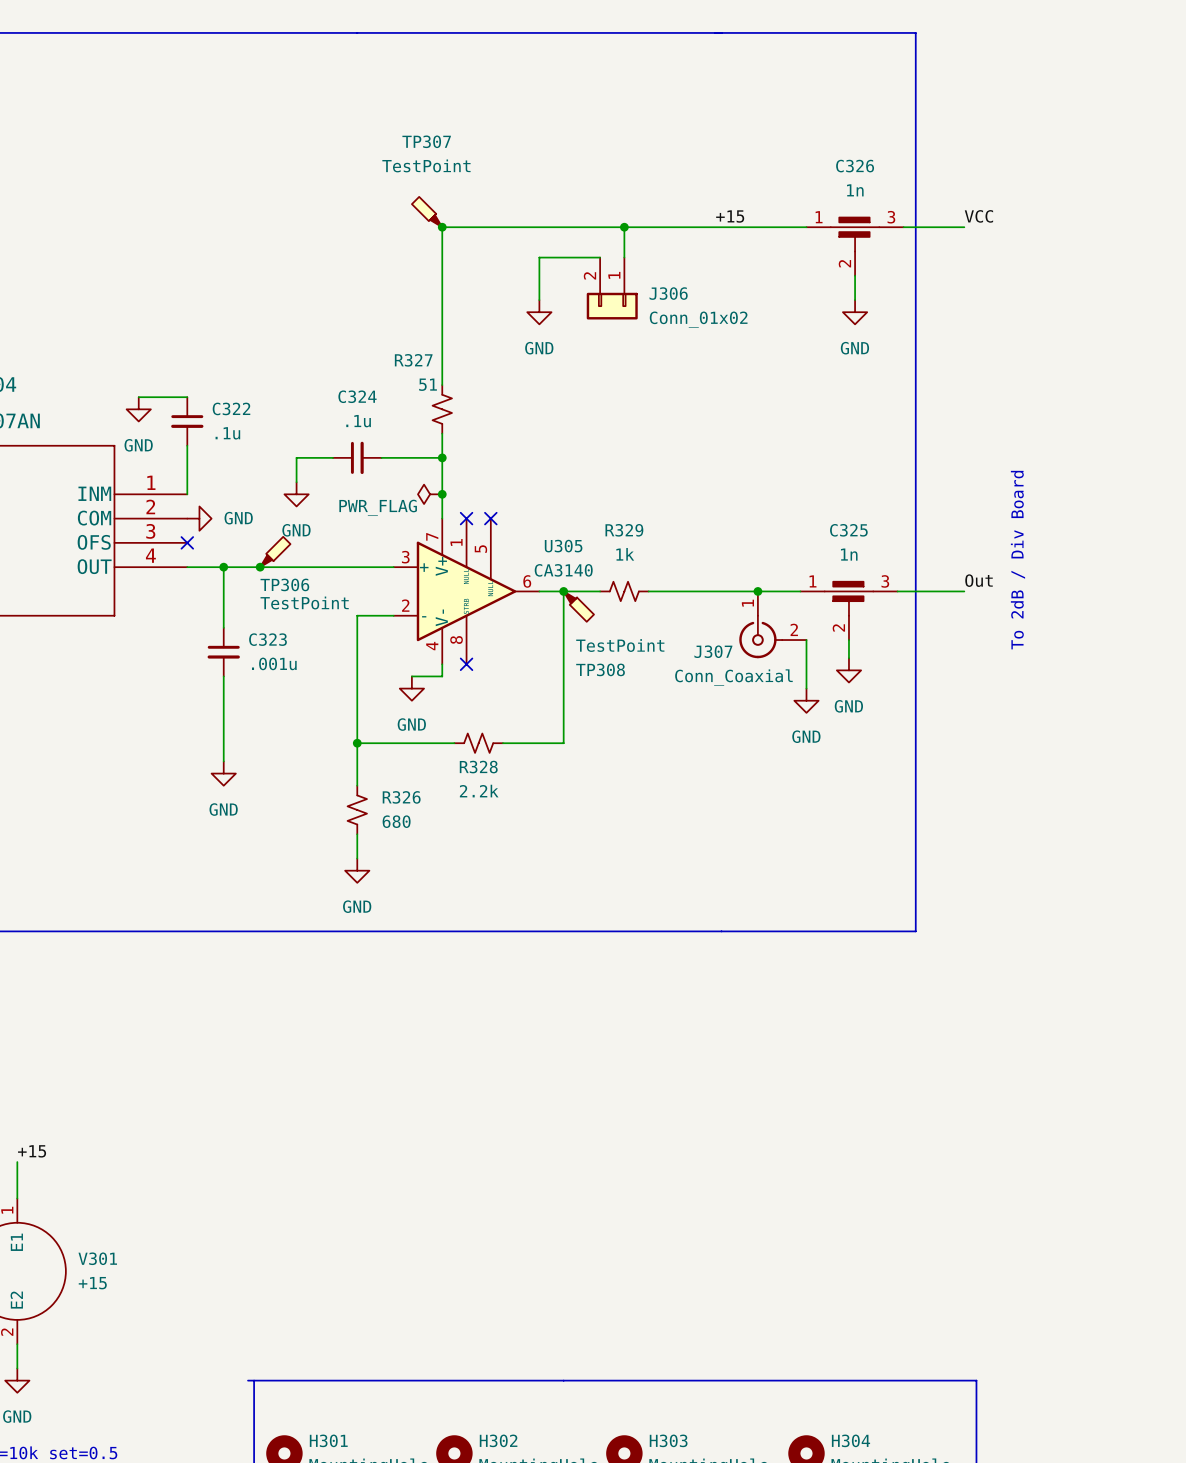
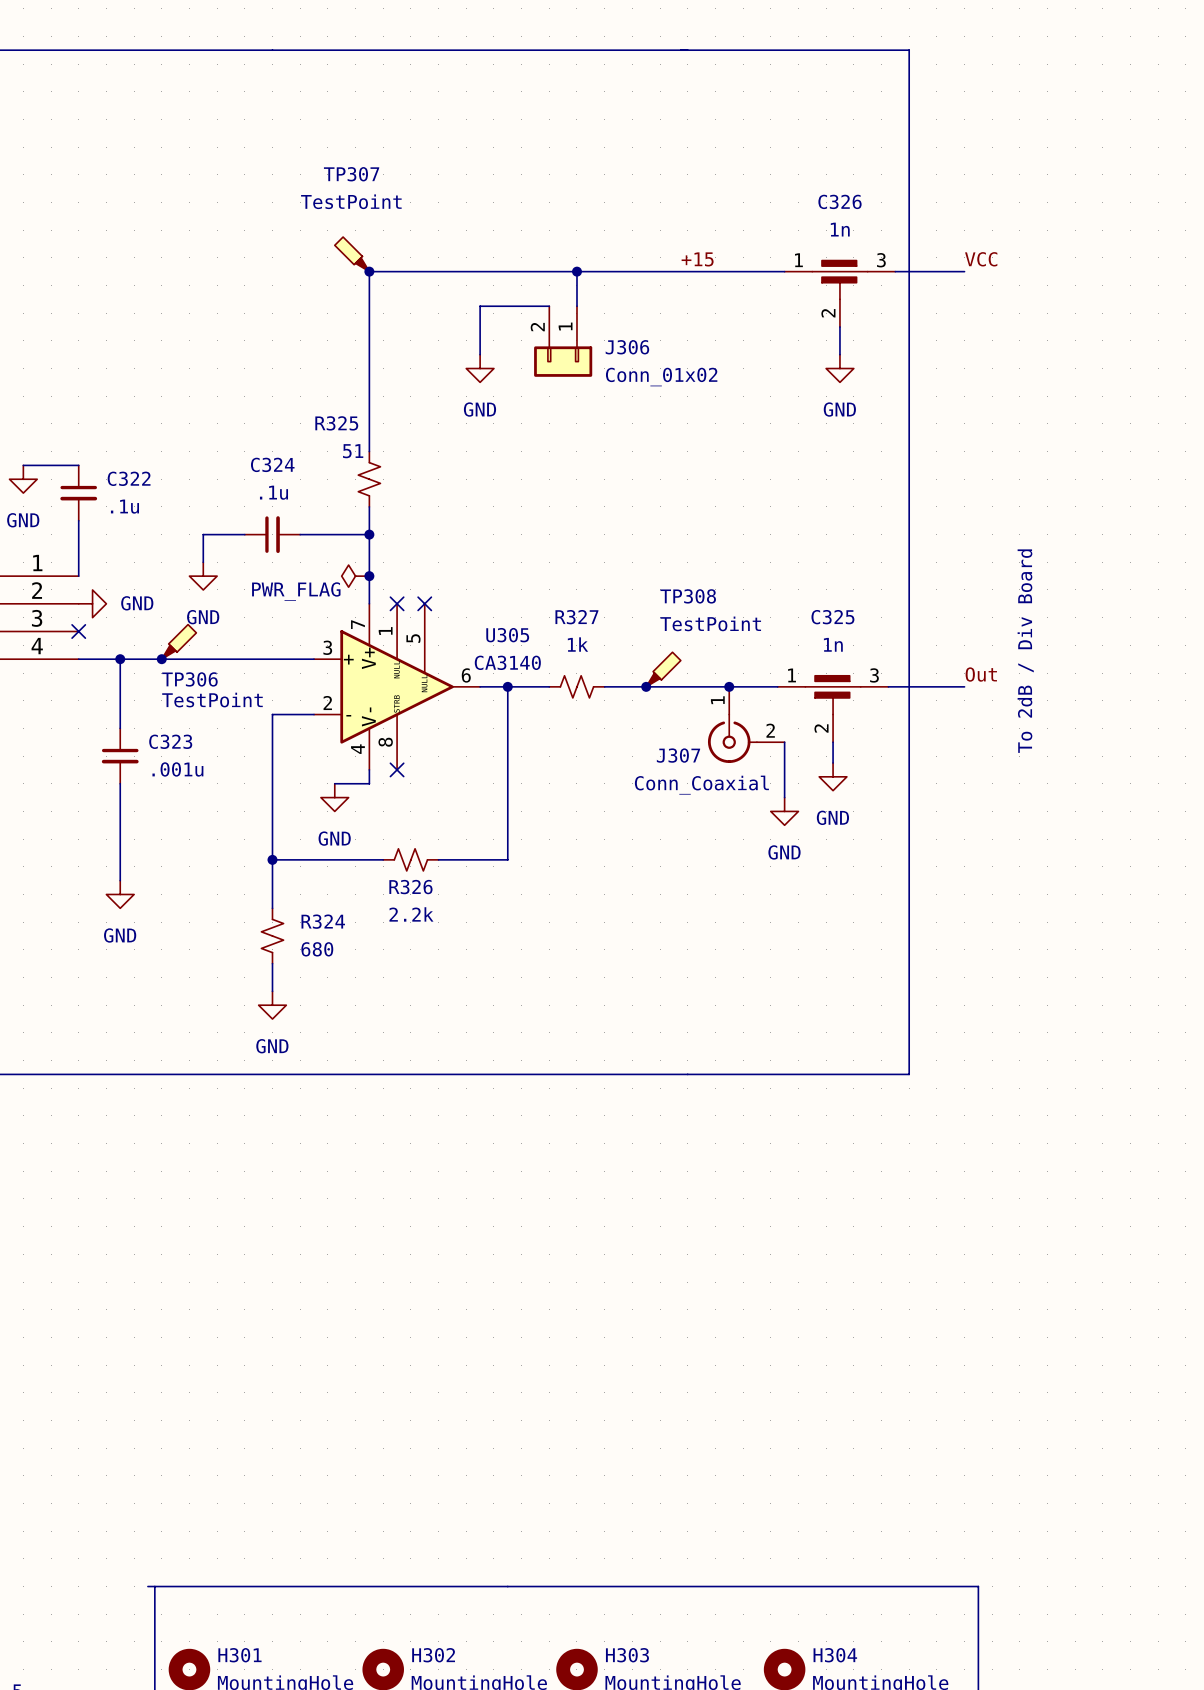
R327 name: R327 (413, 360) -> R325 (336, 423)
R329 name: R329 (624, 530) -> R327 (576, 617)
junction: none -> (646, 686)
TP308 rotation: 0° (578, 606) -> 90° counterclockwise (663, 669)
TP308 position: (578, 606) -> (663, 669)
TP308 name position: TP308 (600, 669) -> TP308 (688, 596)
R328 name: R328 (478, 767) -> R326 (410, 887)
R326 name: R326 (401, 797) -> R324 (323, 921)

